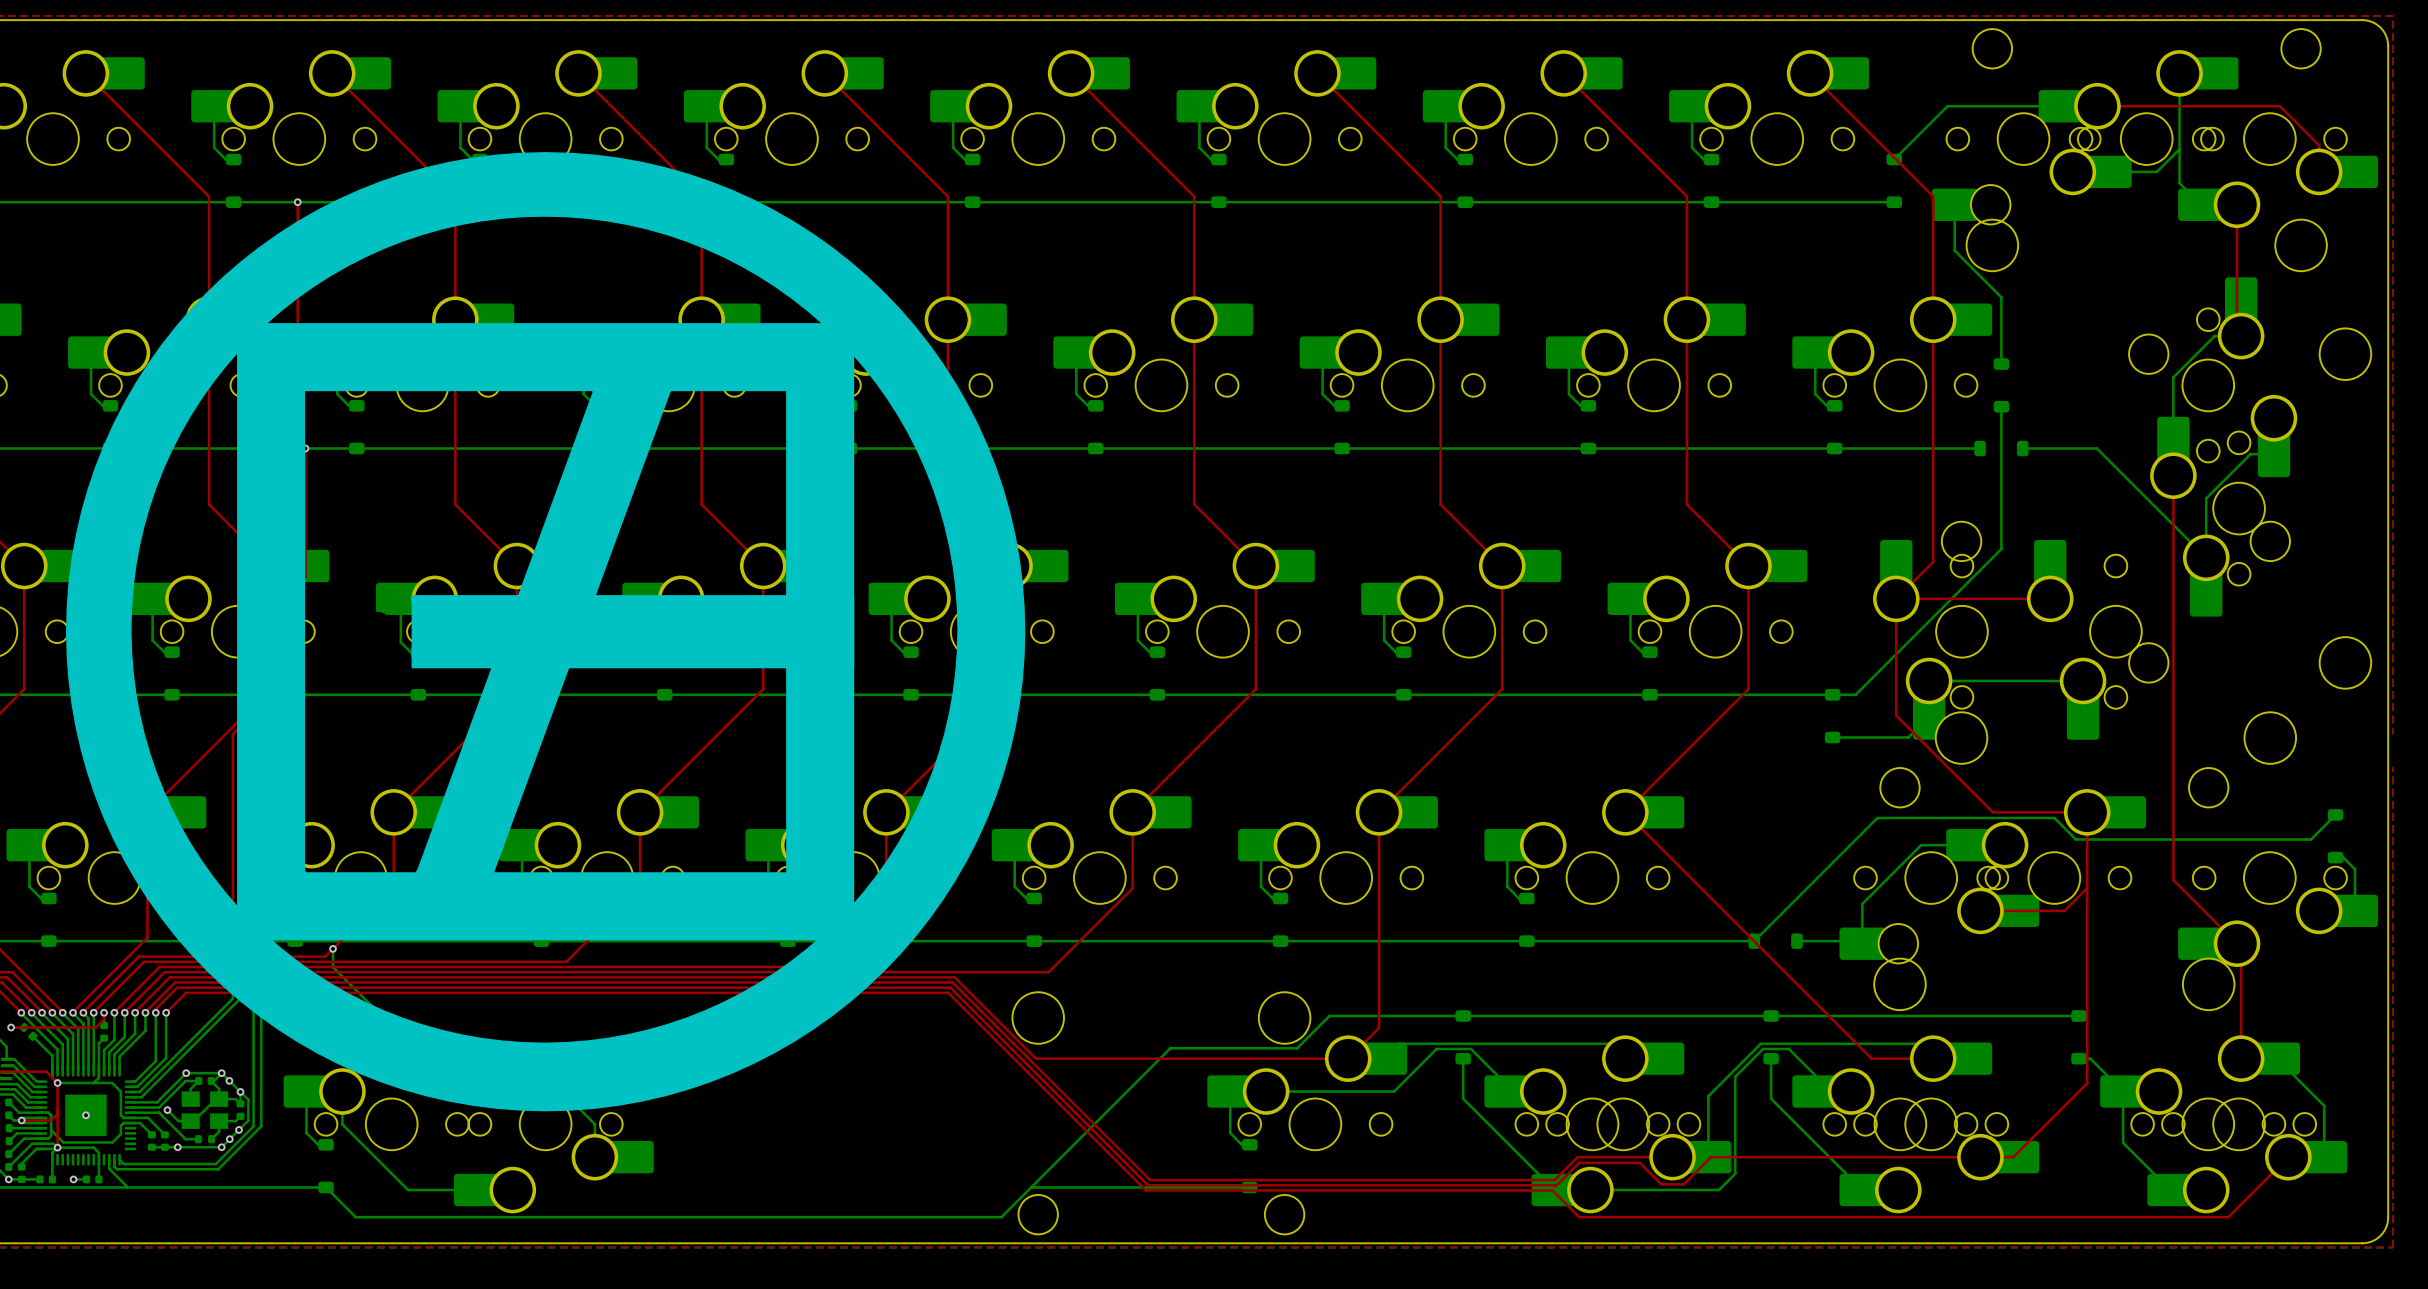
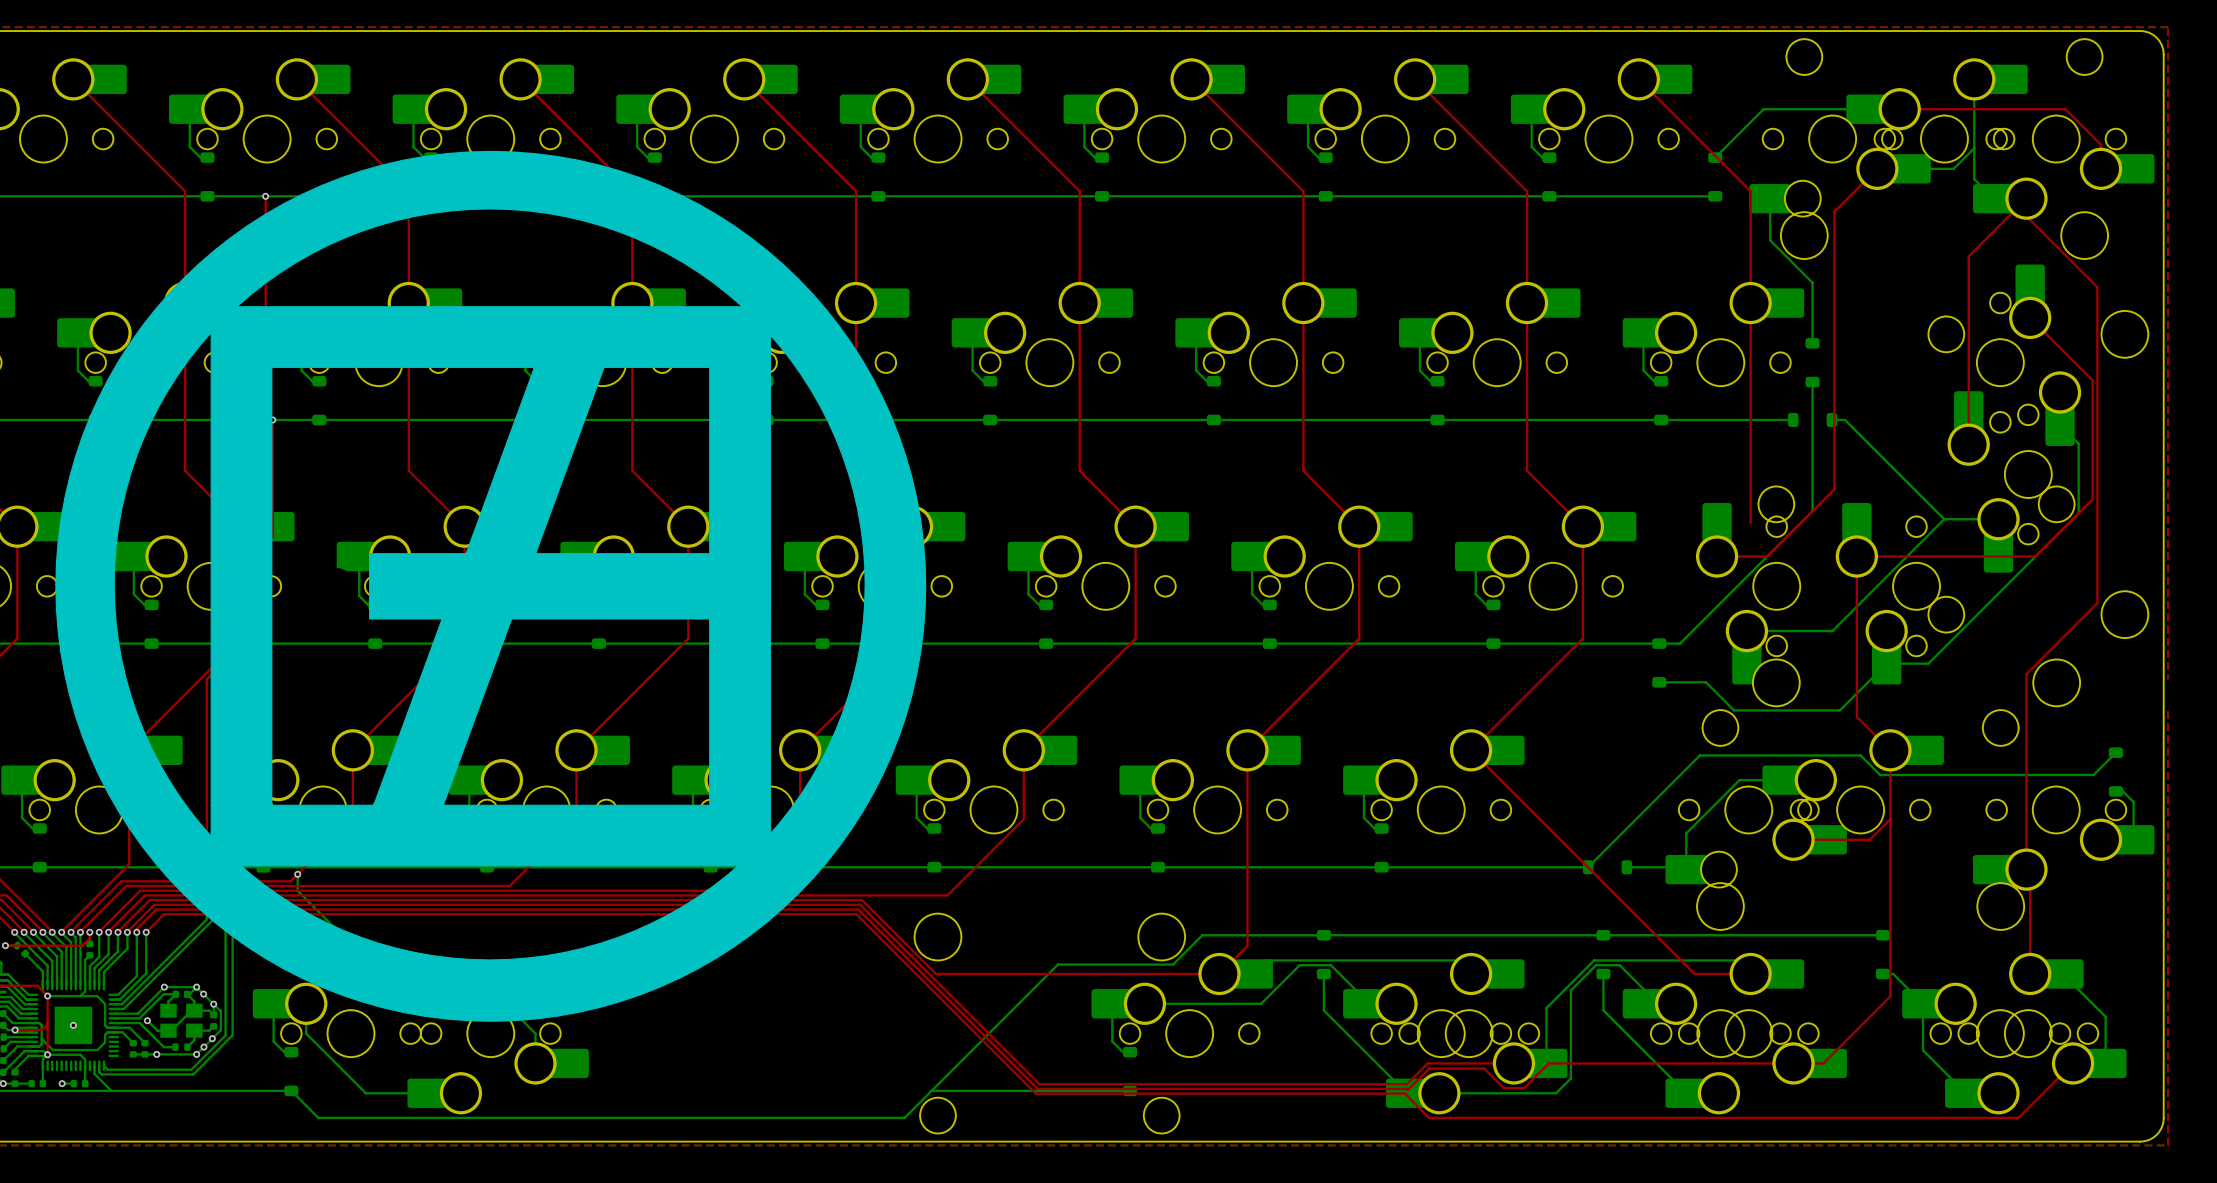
top track: none -> (2026, 198) (1968, 256) (1968, 444)
top track: (2237, 224) (2237, 332) (2241, 336) -> none
bottom track: (2241, 336) (2214, 336) (2173, 377) (2173, 439) -> none
bottom track: (2037, 448) (2096, 448) (2206, 557) (2206, 498) (2250, 454) (2273, 454) -> (1845, 419) (1944, 519)
top track: (2173, 475) (2173, 880) (2237, 943) -> (2026, 216) (2097, 287) (2097, 603) (2026, 674) (2026, 869)
bottom track: none -> (1944, 519) (1998, 519)
top track: (1933, 561) (1896, 598) (1896, 715) (1992, 812) (2087, 812) -> (2030, 317) (2092, 380) (2092, 499) (2035, 556) (1856, 556) (1856, 716) (1890, 750)
top track: (1951, 598) (2050, 598) -> (1767, 556) (1834, 489) (1834, 211) (1877, 168)
bottom track: (2023, 680) (2083, 680) -> (1832, 631) (1944, 519)
bottom track: (1929, 716) (1908, 737) (1884, 737) -> (2060, 425) (2078, 443) (2078, 513) (1928, 663) (1886, 663) (1839, 710) (1734, 710) (1705, 682)

